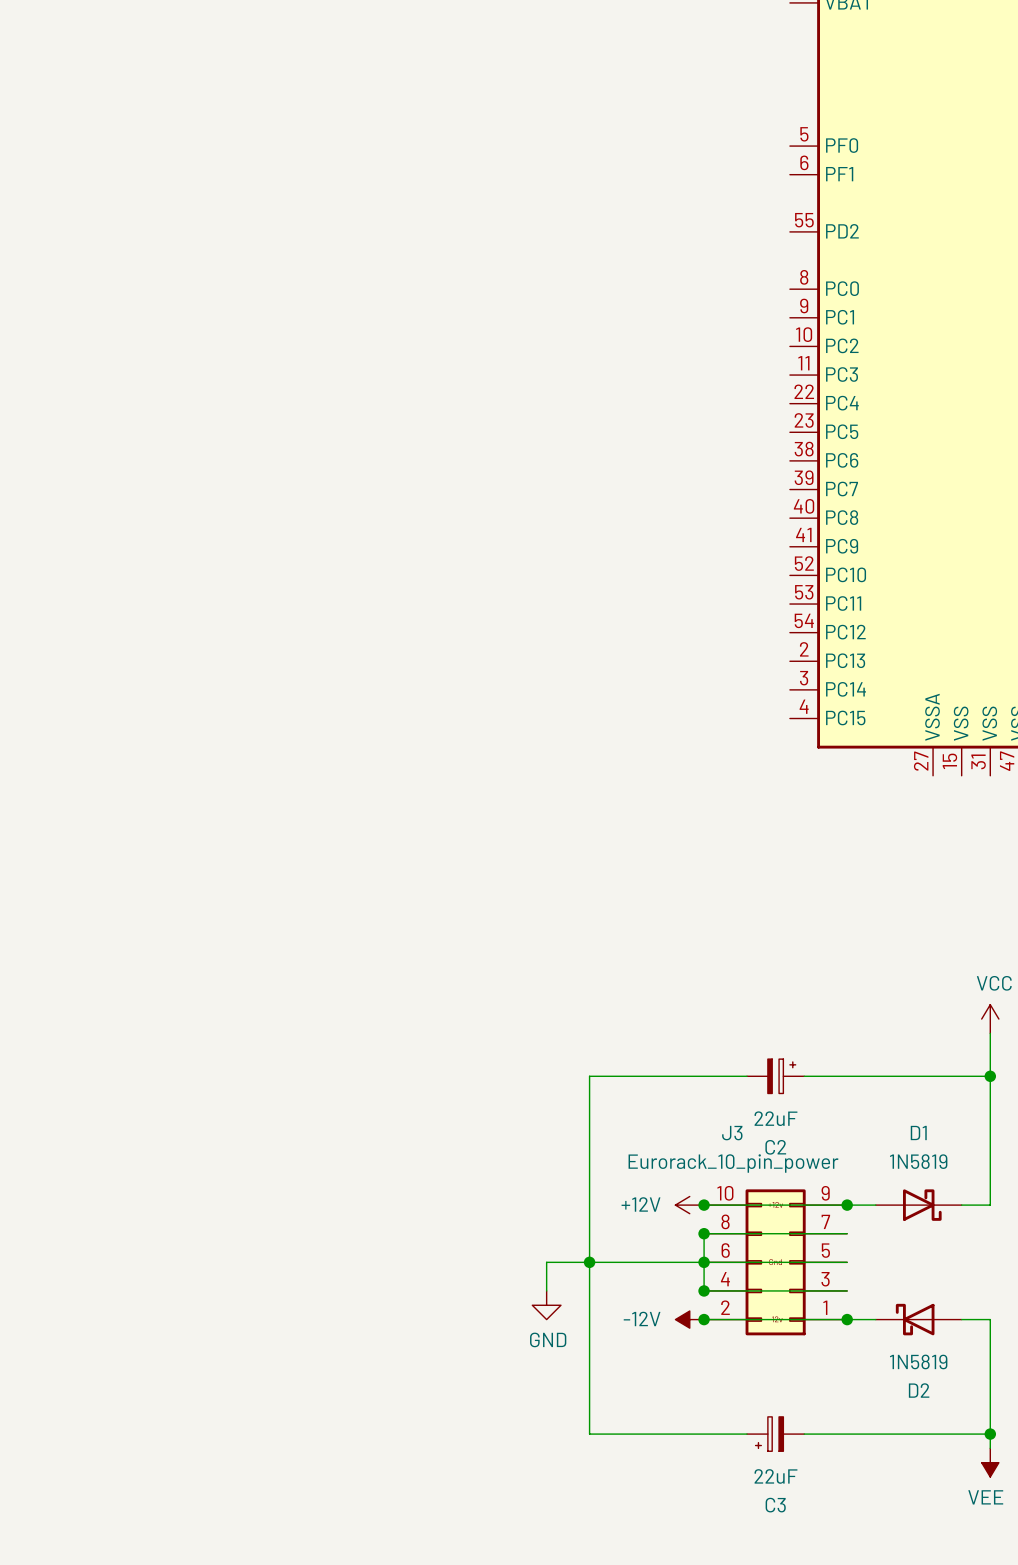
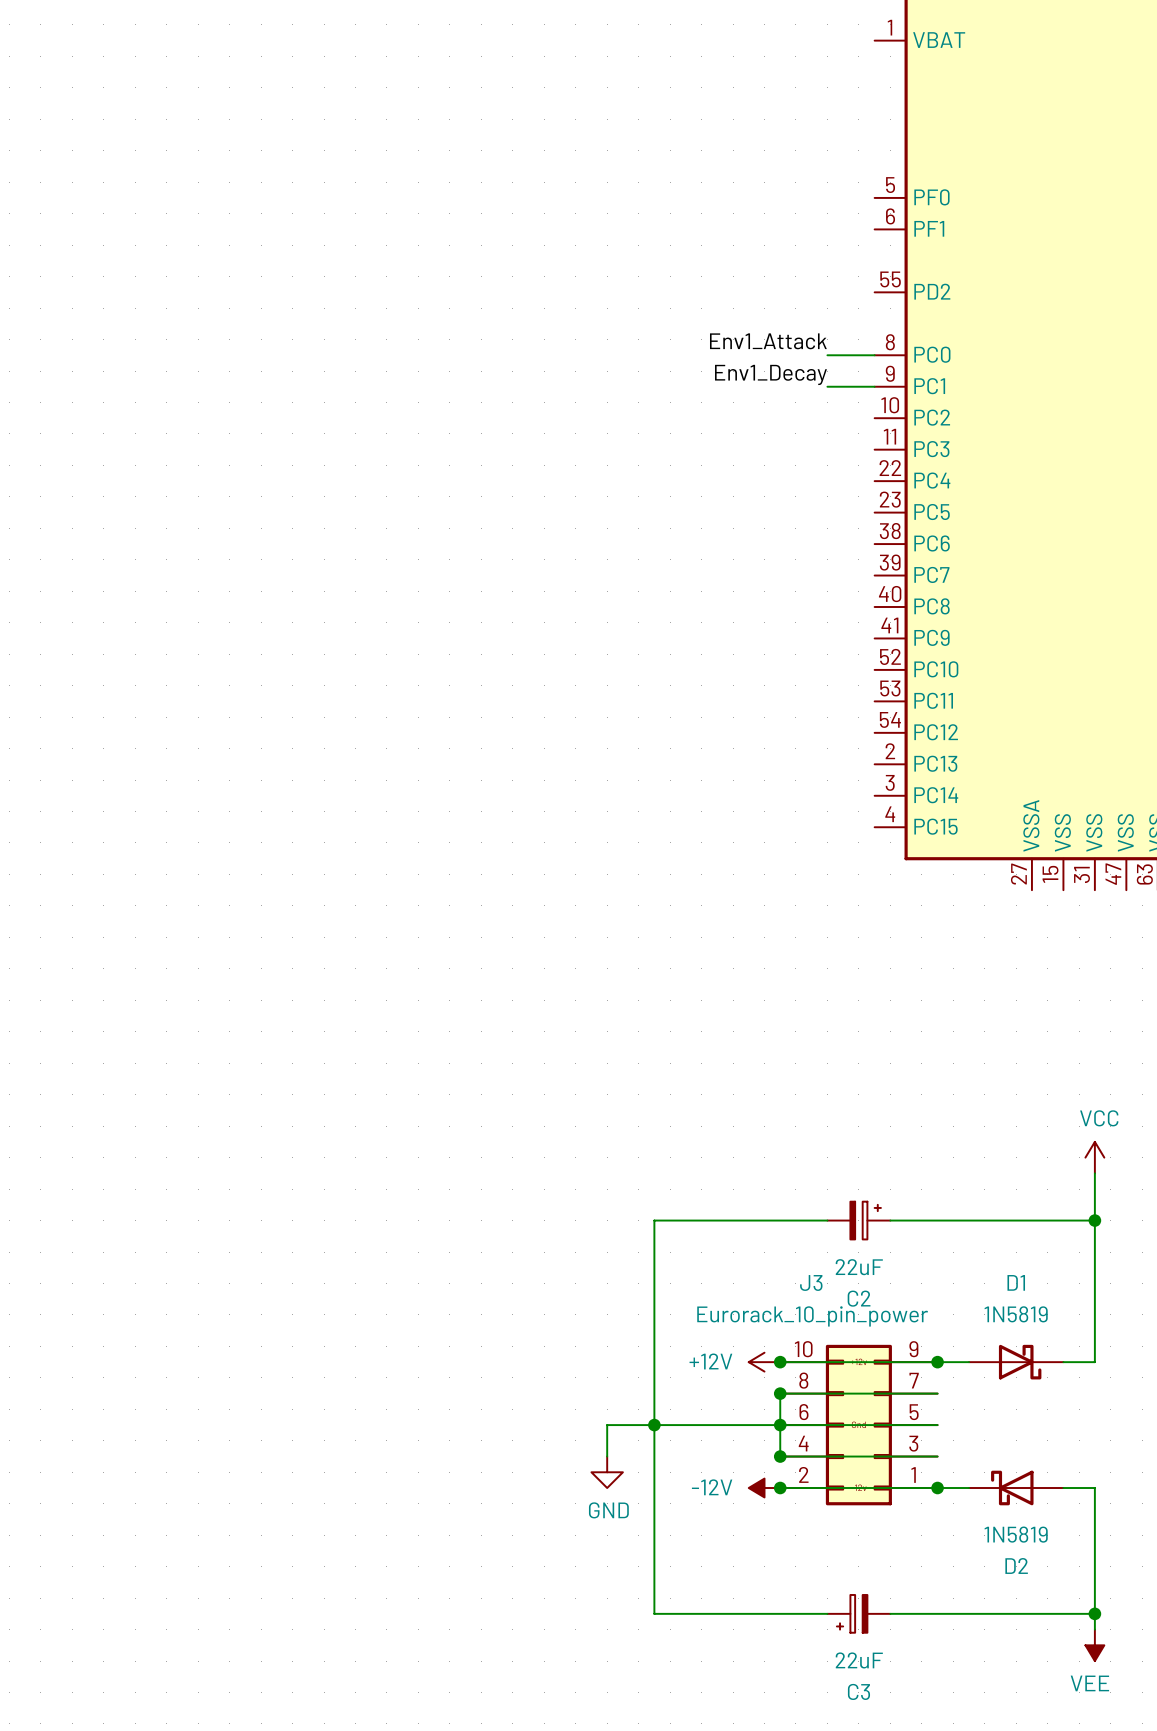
label: none -> Env1_Attack (768, 341)
wire: none -> (827, 355) (874, 355)
label: none -> Env1_Decay (770, 374)
wire: none -> (827, 386) (874, 386)

